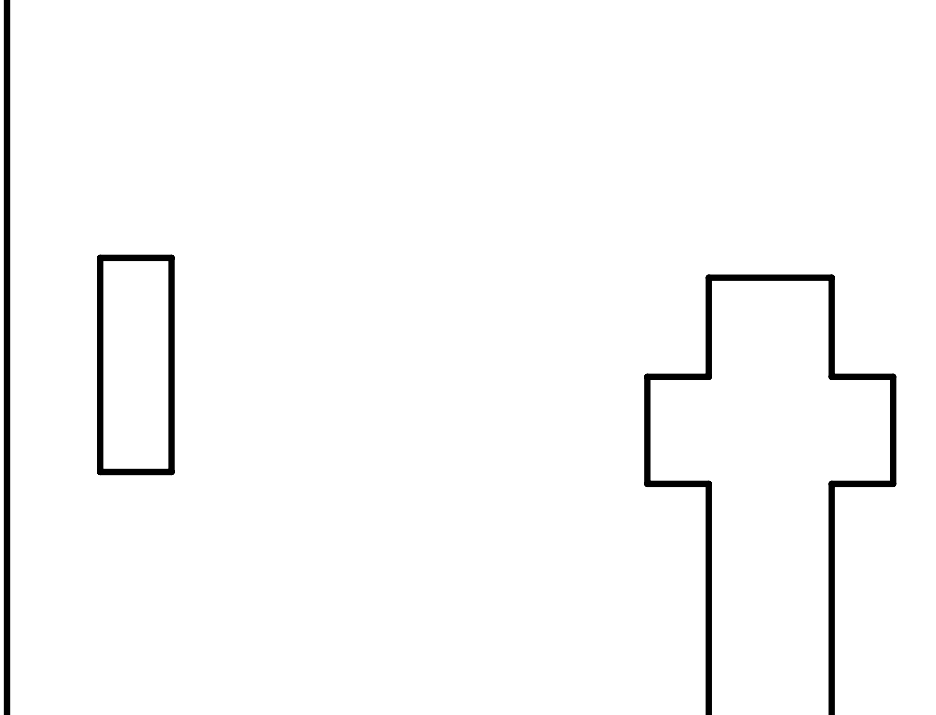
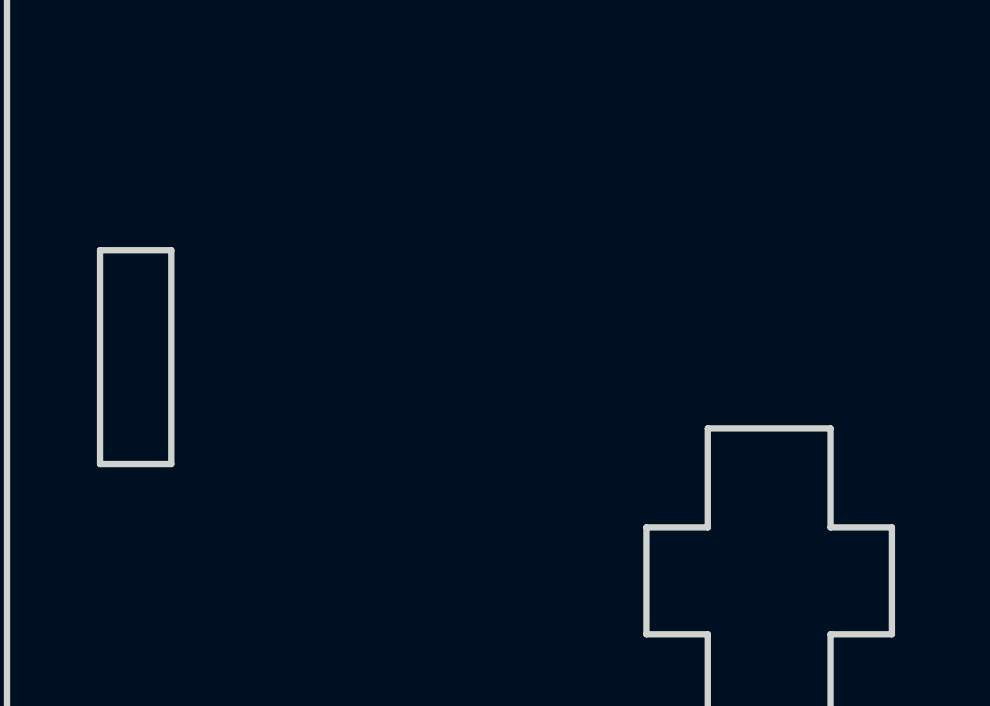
board edge: (831, 483) (893, 483) (893, 376) (831, 376) (831, 277) (708, 277) (708, 376) (647, 376) (647, 483) (708, 483) -> (830, 475) (830, 428) (707, 428) (707, 475)
board edge: (708, 535) (708, 642) -> (707, 527) (646, 527) (646, 634) (707, 634)
board edge: (831, 535) (831, 642) -> (830, 527) (891, 527) (891, 634) (830, 634)

